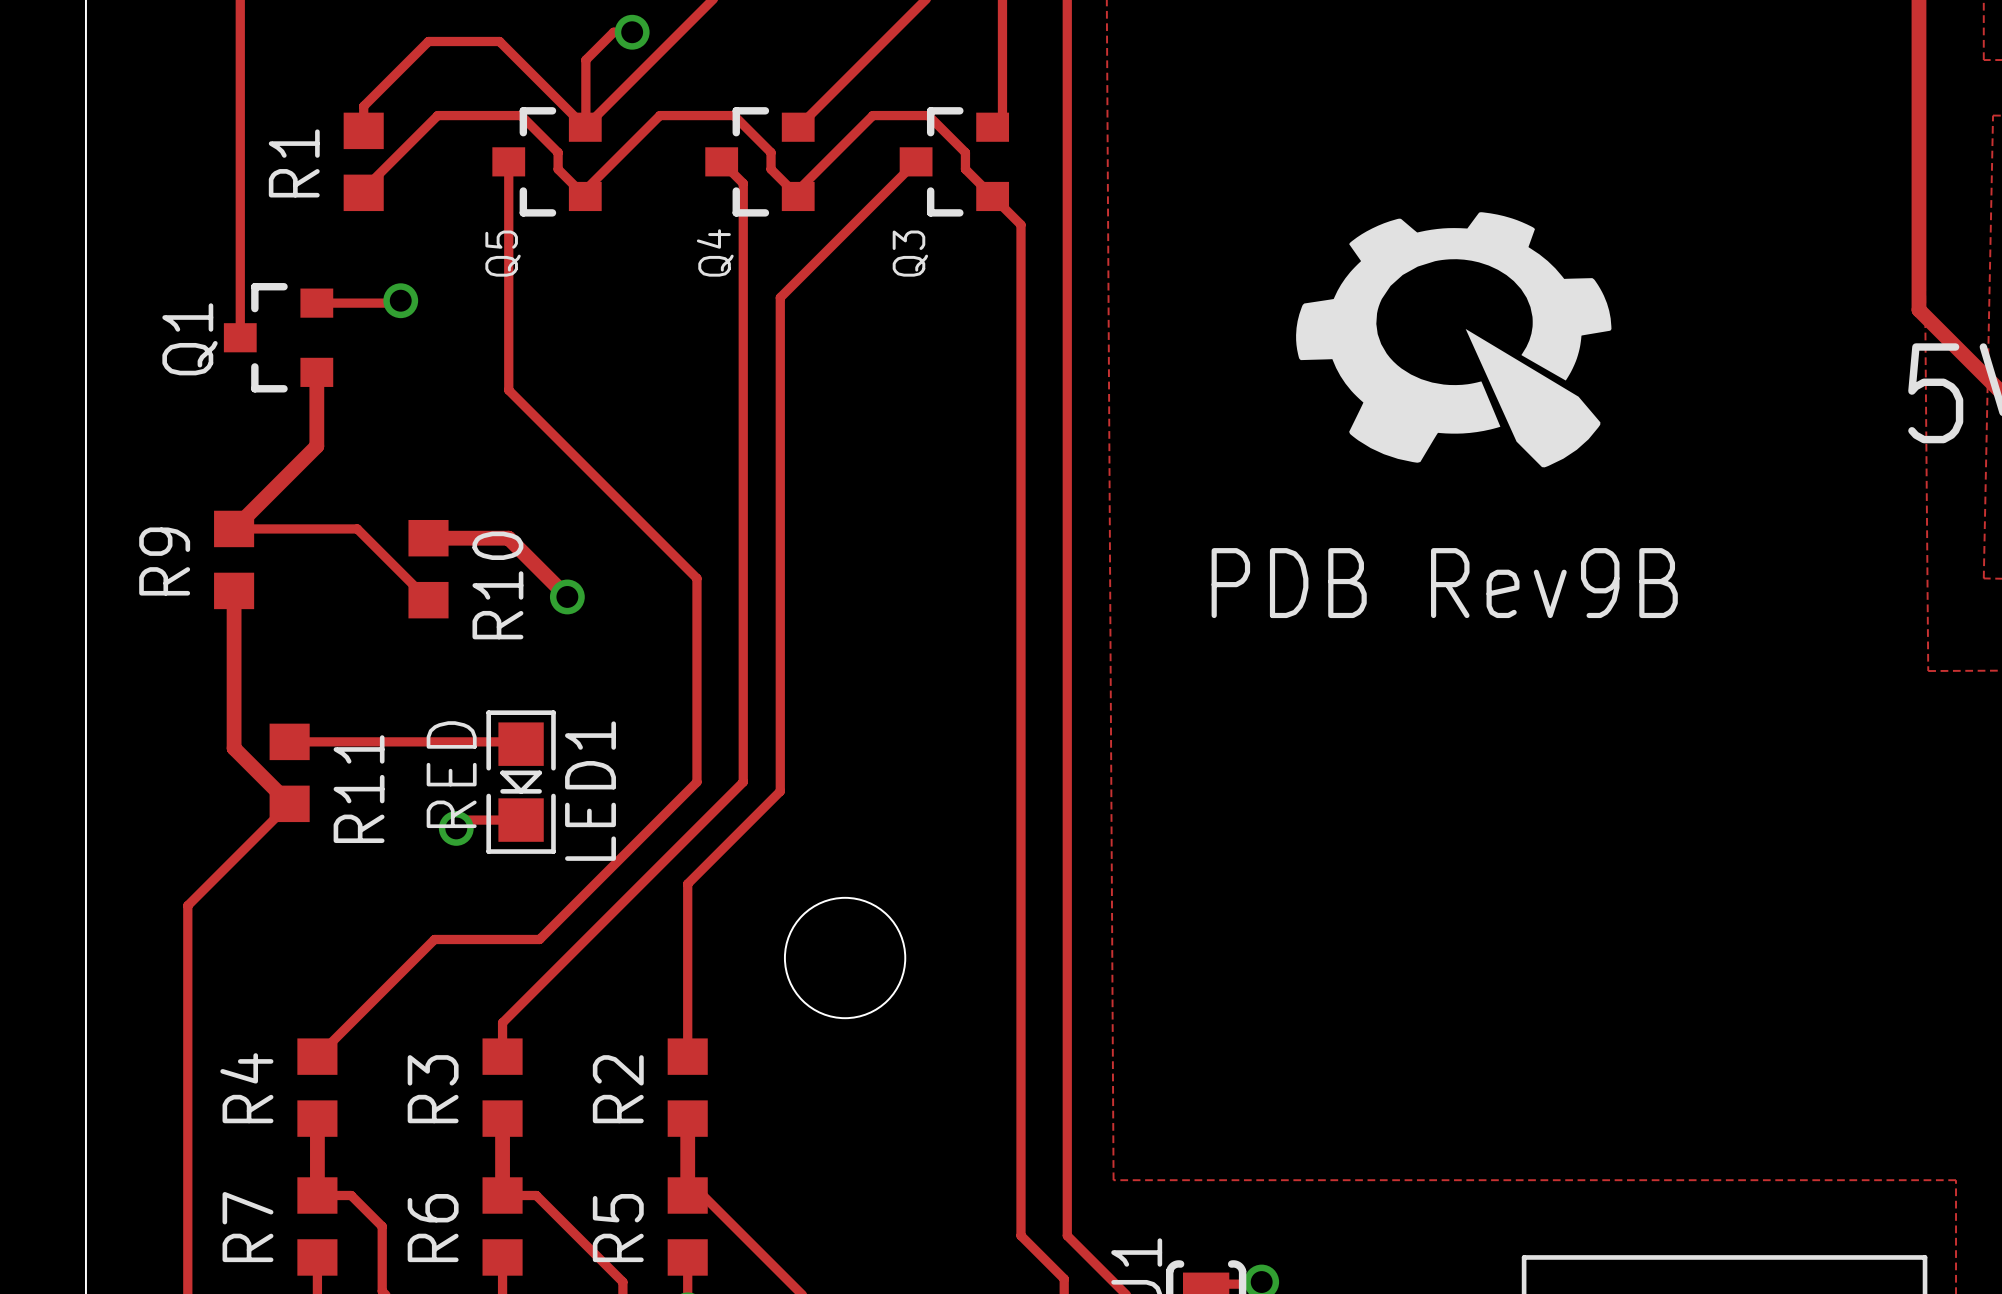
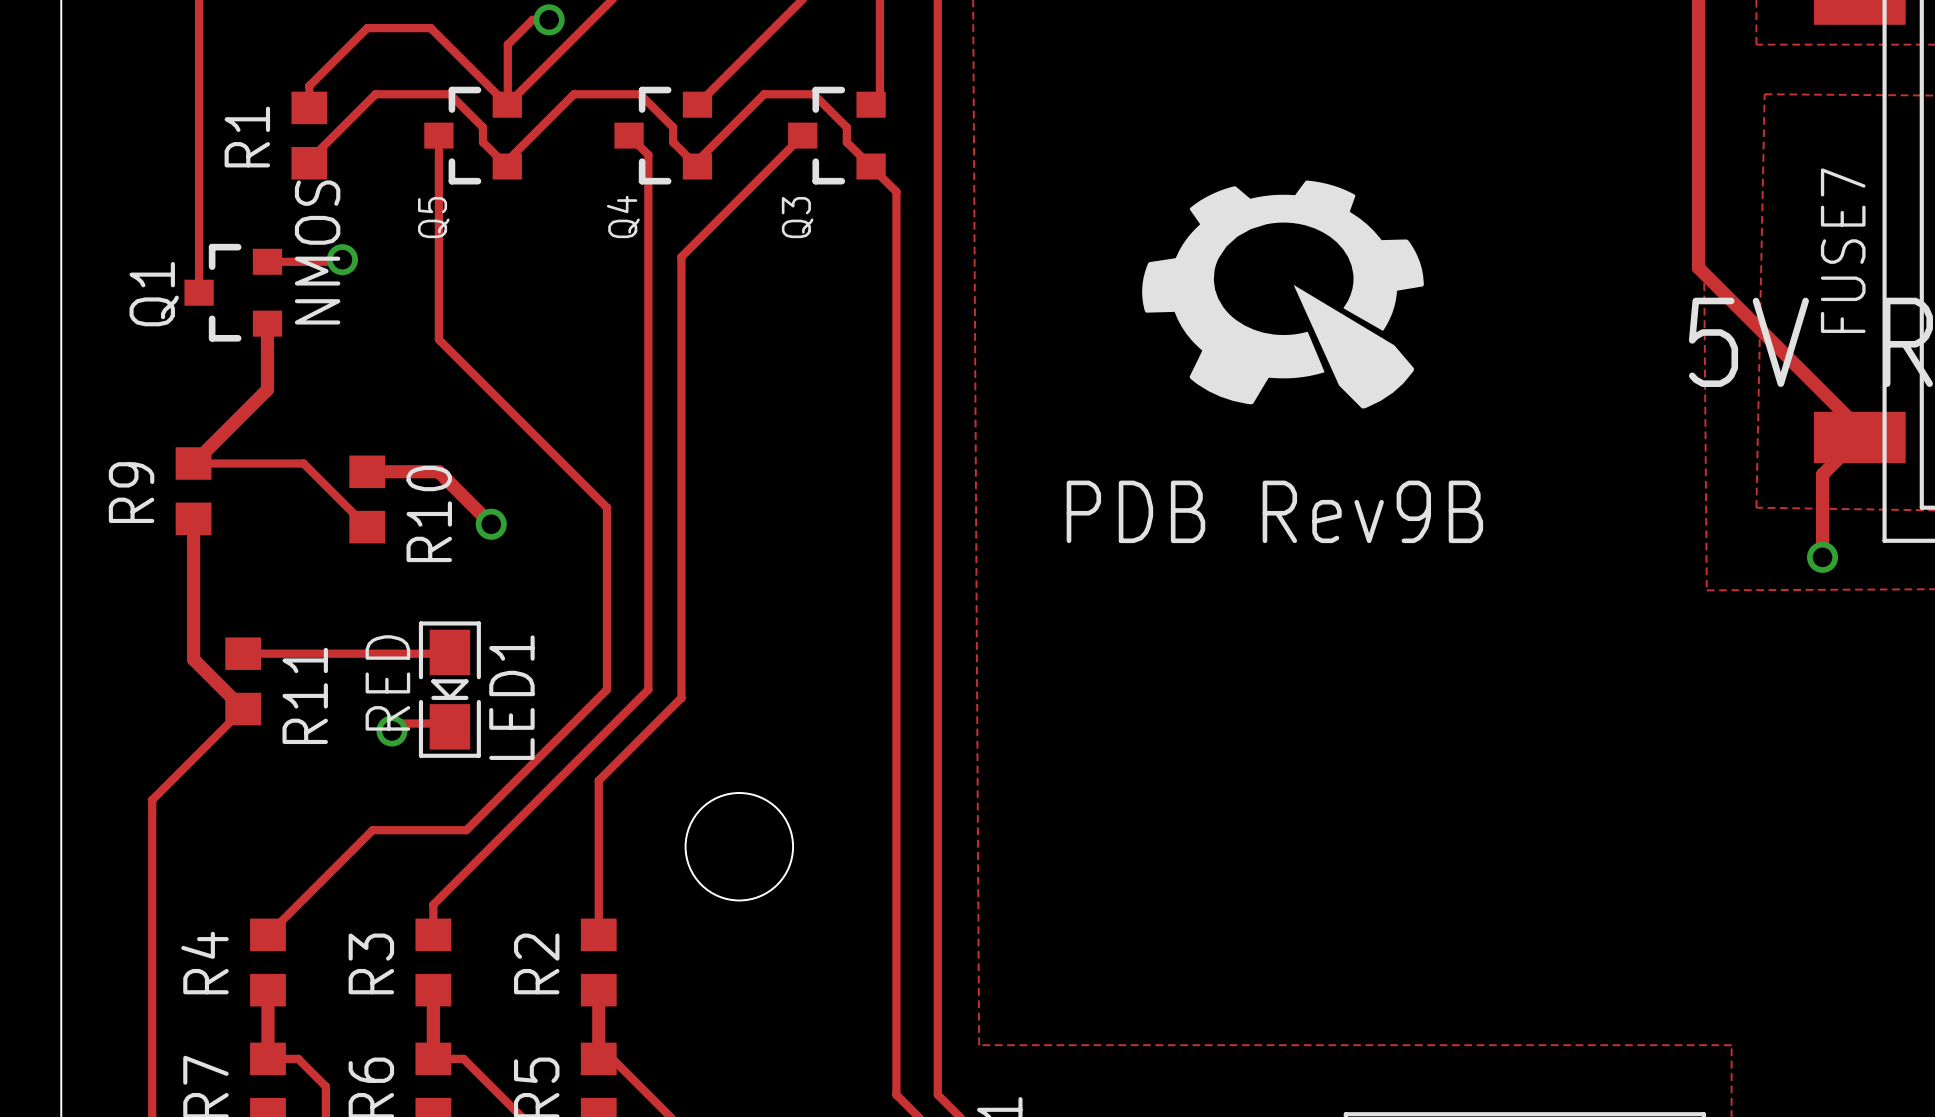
Q1 value: none -> NMOS (317, 252)
LED1 footprint: [486, 710, 556, 854] -> [418, 621, 481, 758]

